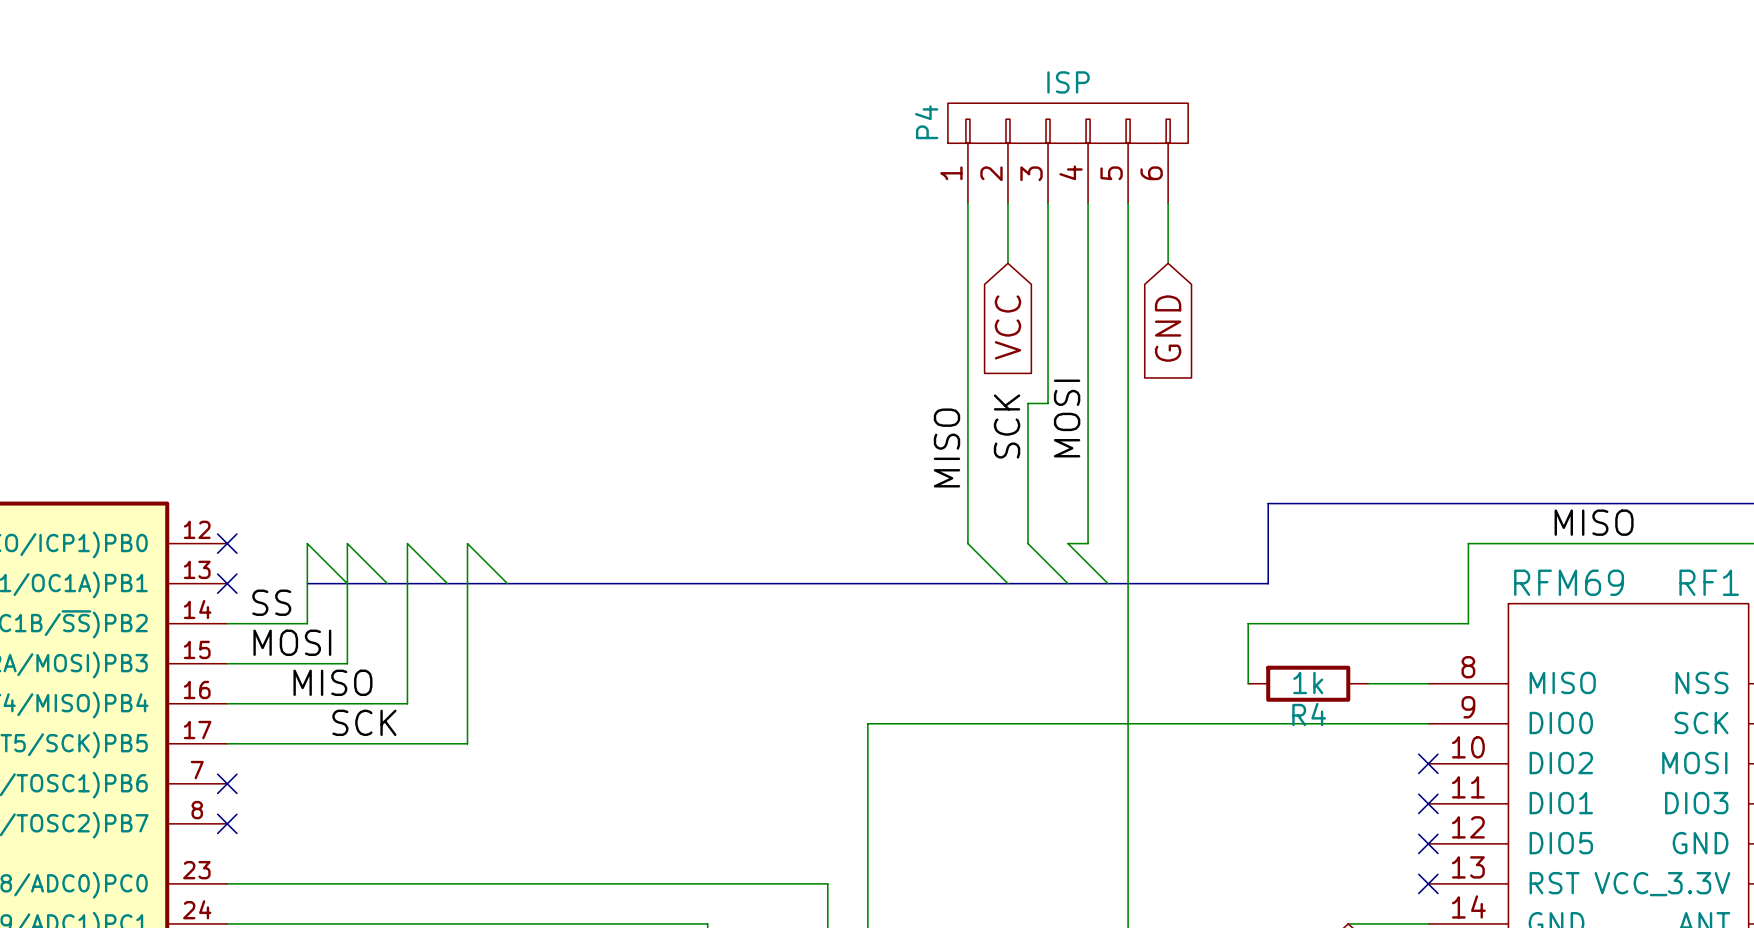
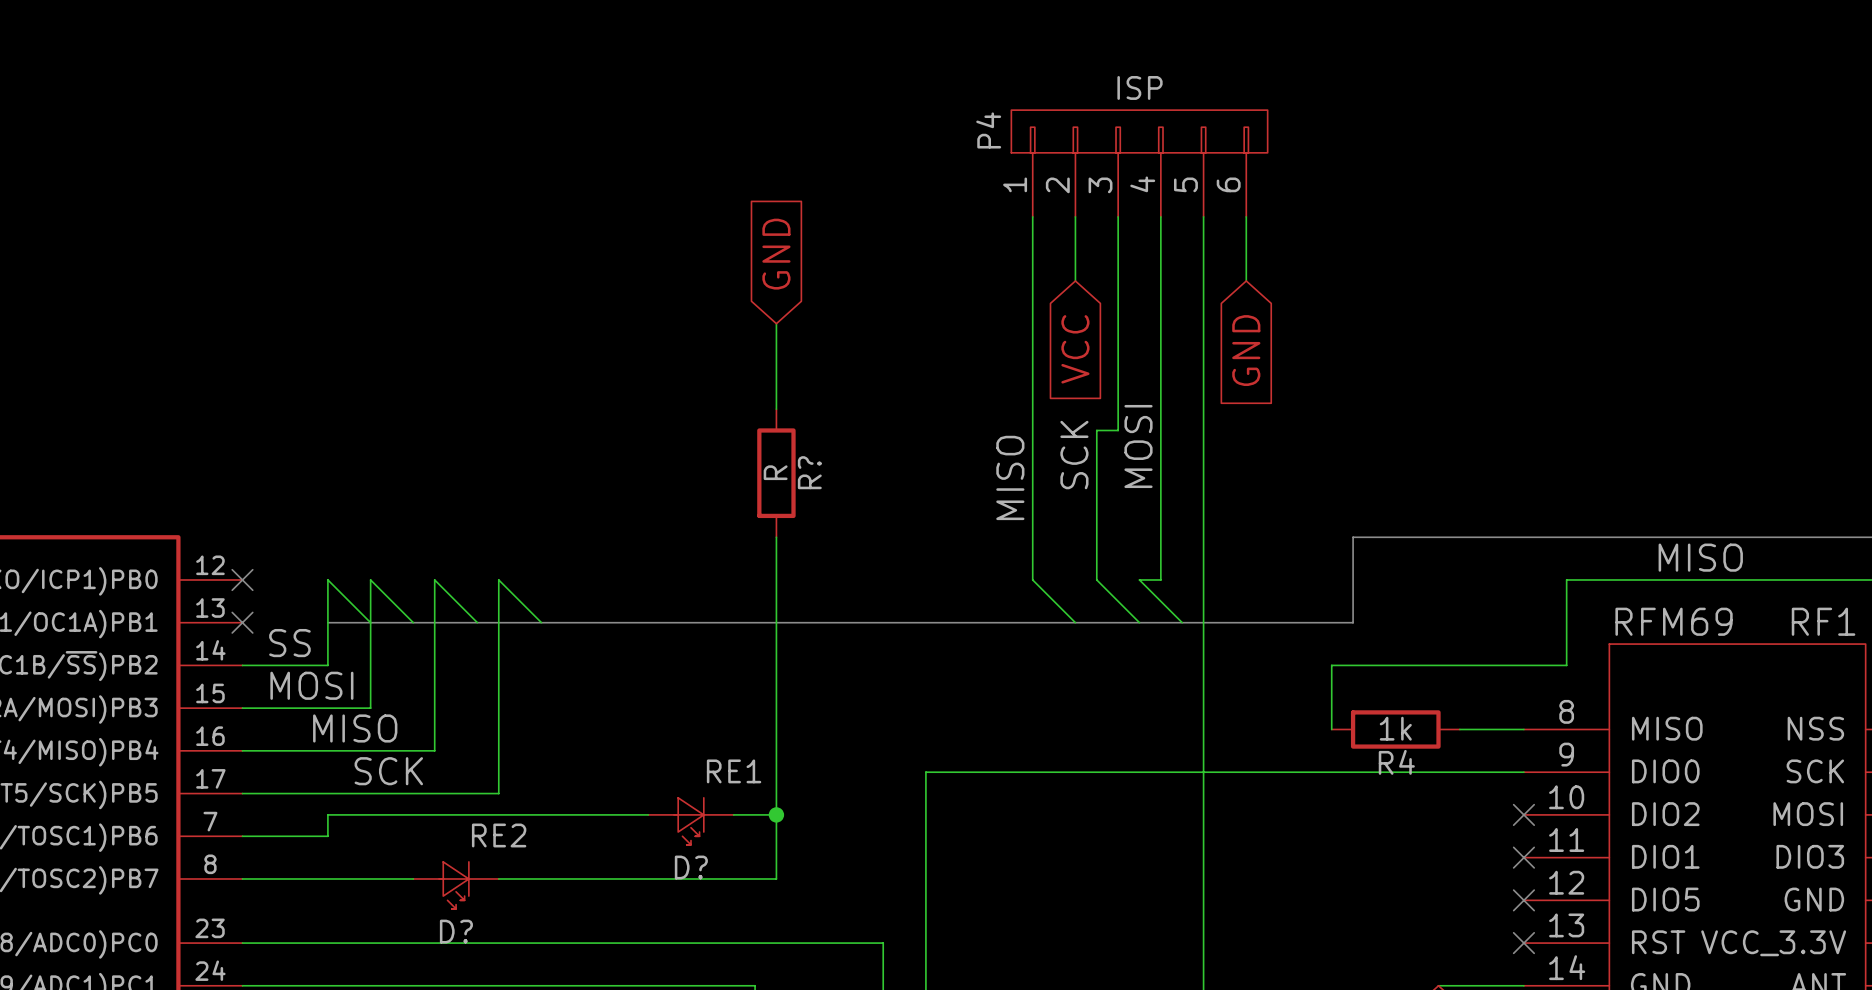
global label: none -> GND (776, 254)
wire: none -> (776, 323) (776, 409)
R?: none -> R (776, 473)
wire: none -> (776, 537) (776, 878) (498, 878)
wire: none -> (648, 814) (327, 814) (327, 836) (242, 836)
wire: none -> (733, 814) (776, 814)
junction: none -> (776, 814)
D?: none -> RE1 (691, 821)
no-connect mark: (227, 783) -> none
wire: none -> (242, 878) (413, 878)
no-connect mark: (227, 823) -> none
D?: none -> RE2 (456, 885)

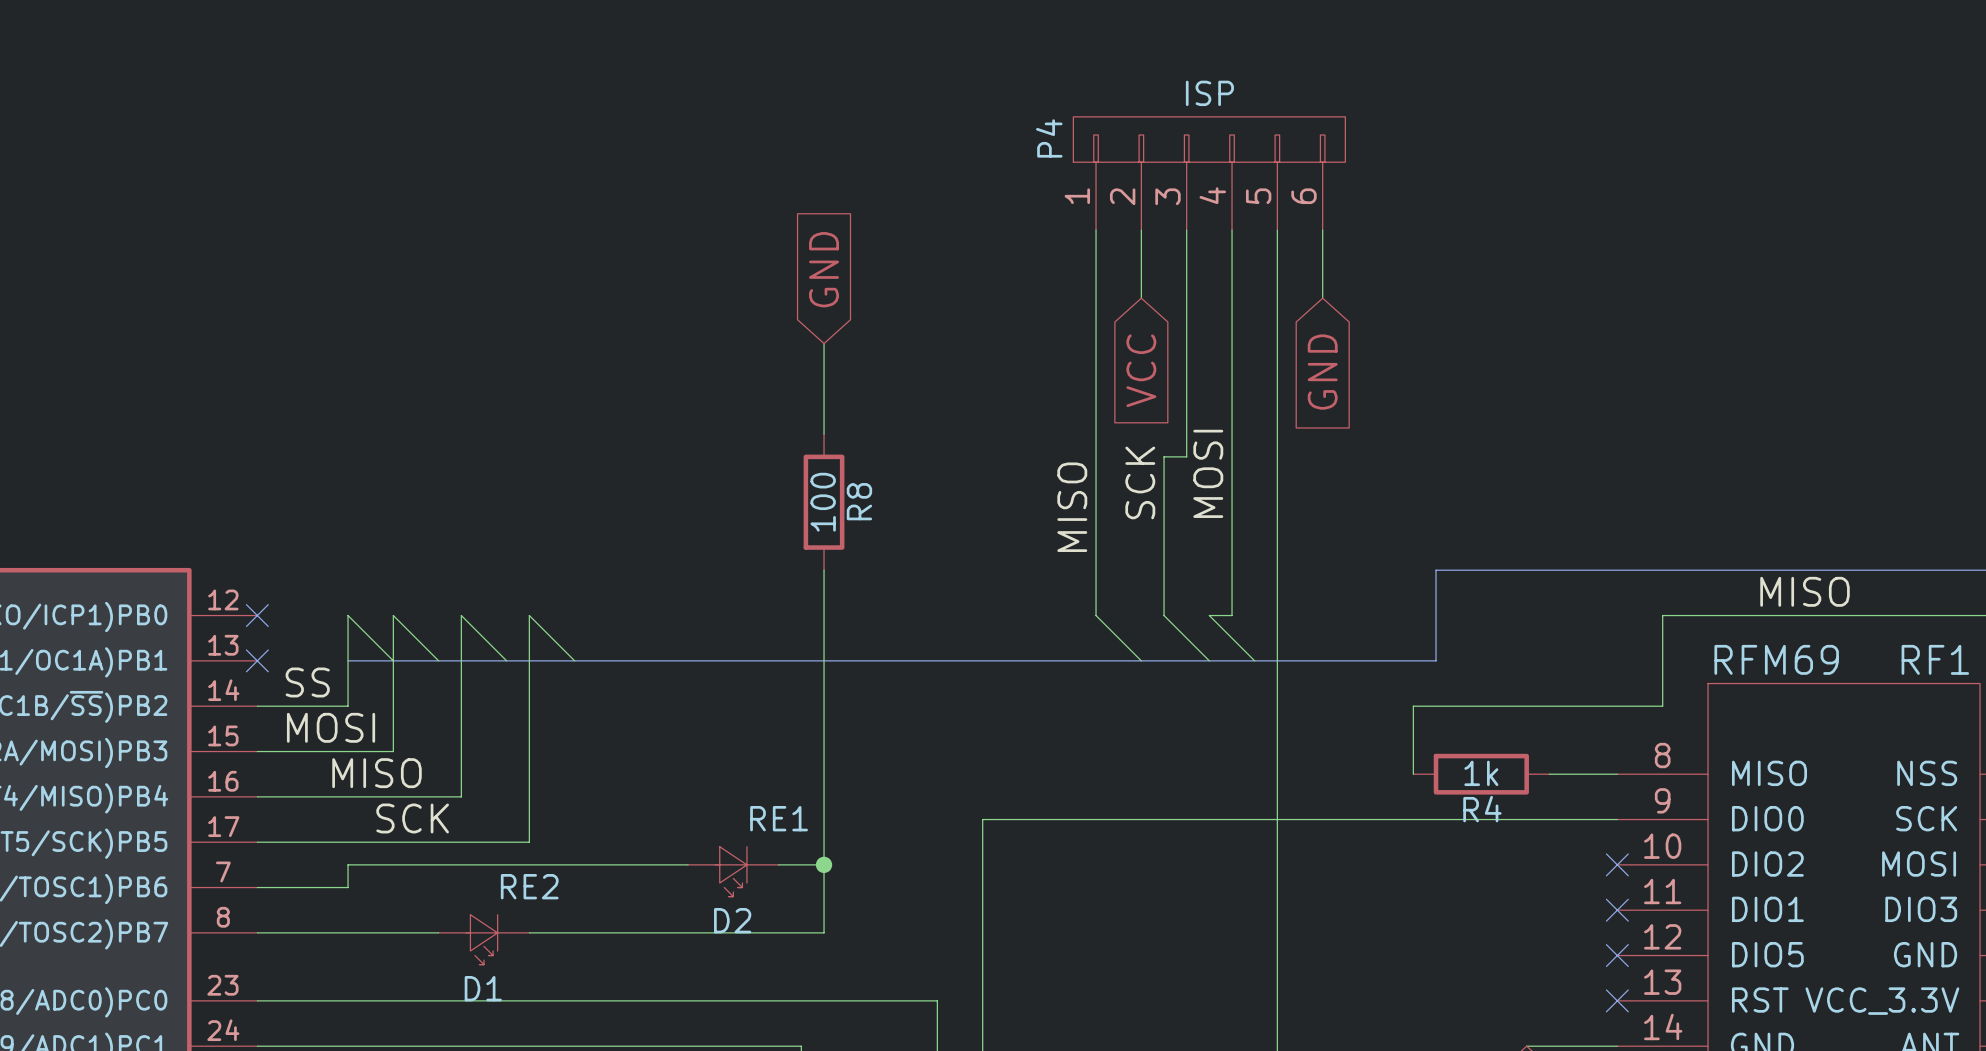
R? value: R (775, 472) -> 100 (823, 502)
R? name: R? (809, 472) -> R8 (859, 501)
D? name: D? (691, 867) -> D2 (732, 920)
D? name: D? (456, 931) -> D1 (483, 988)

